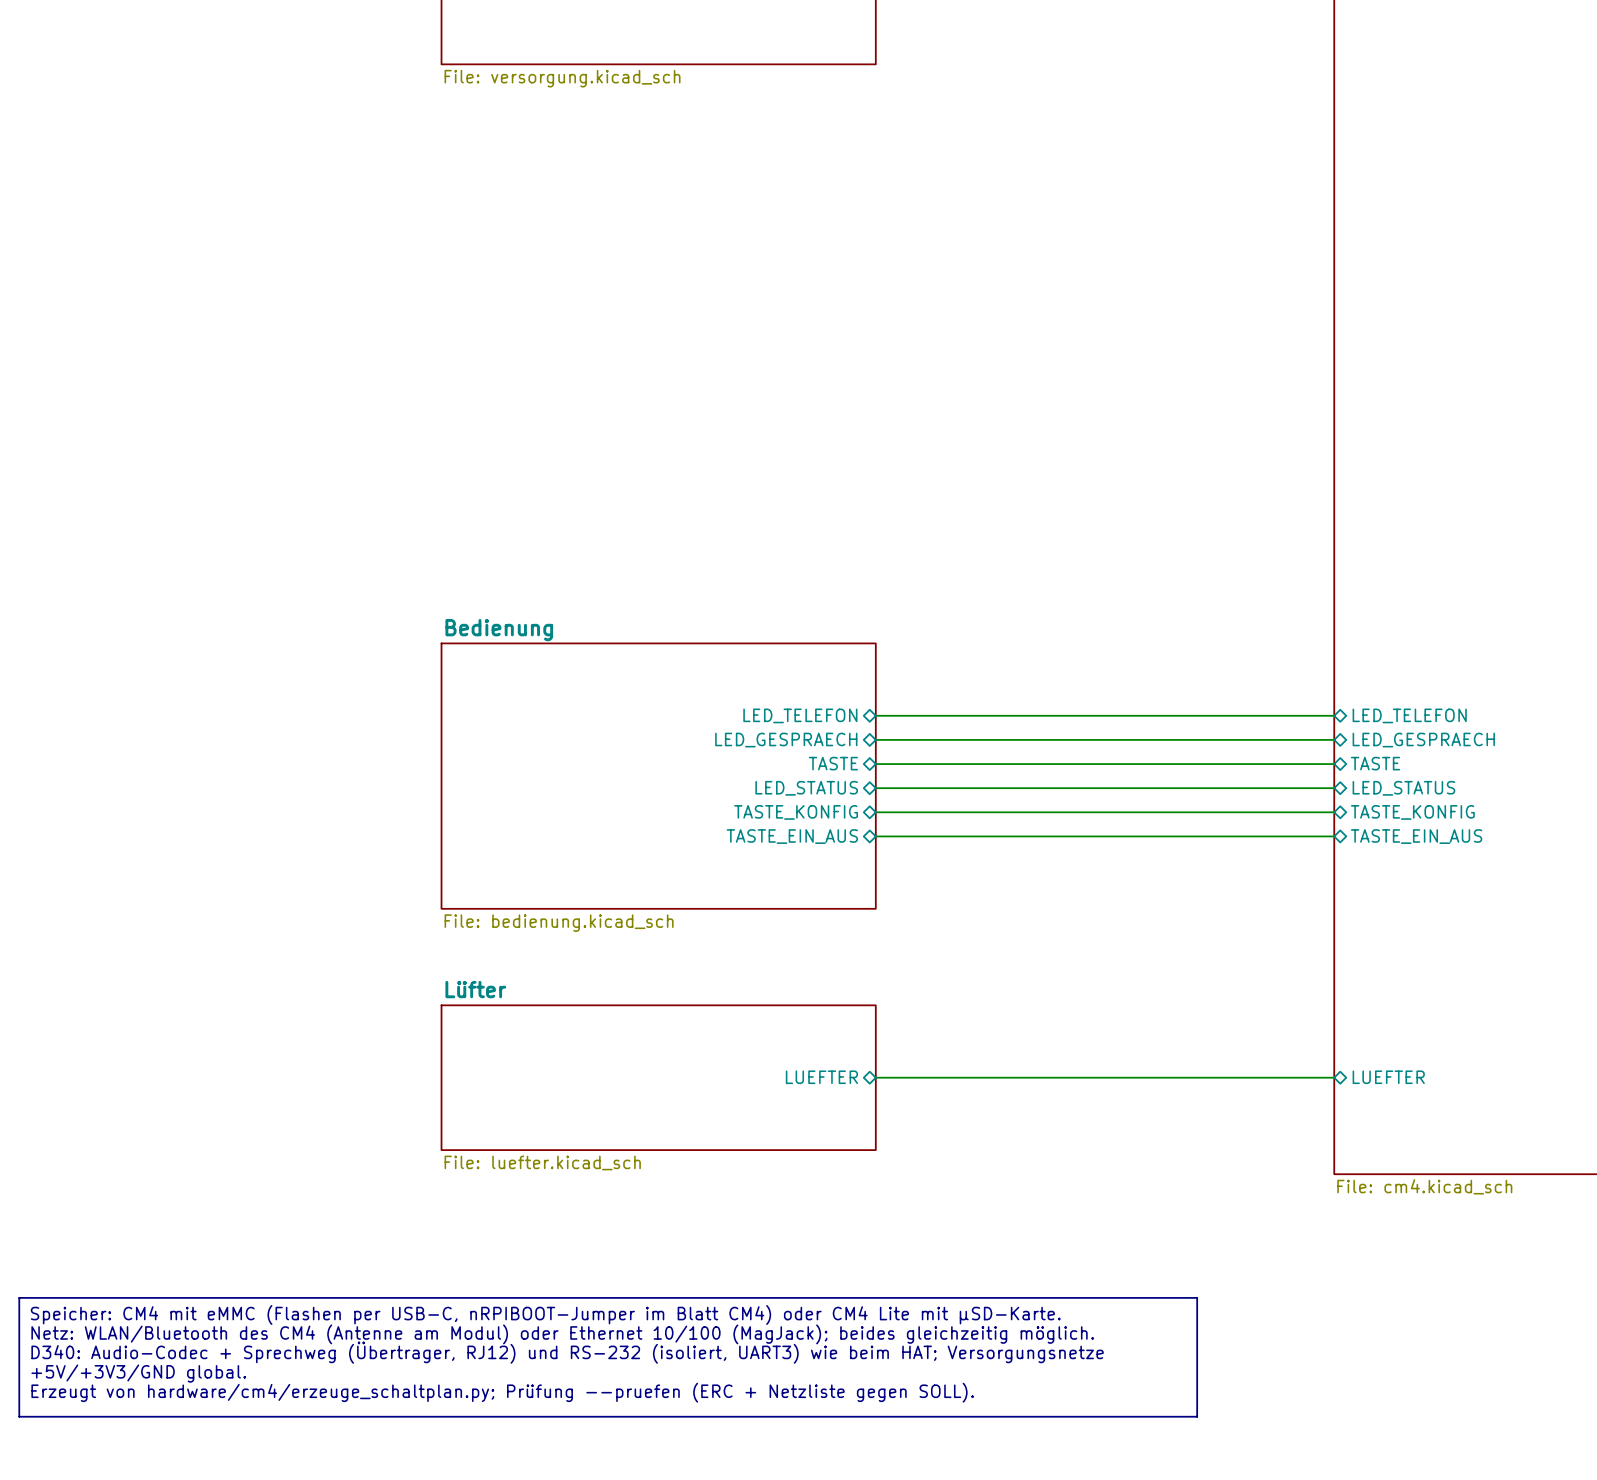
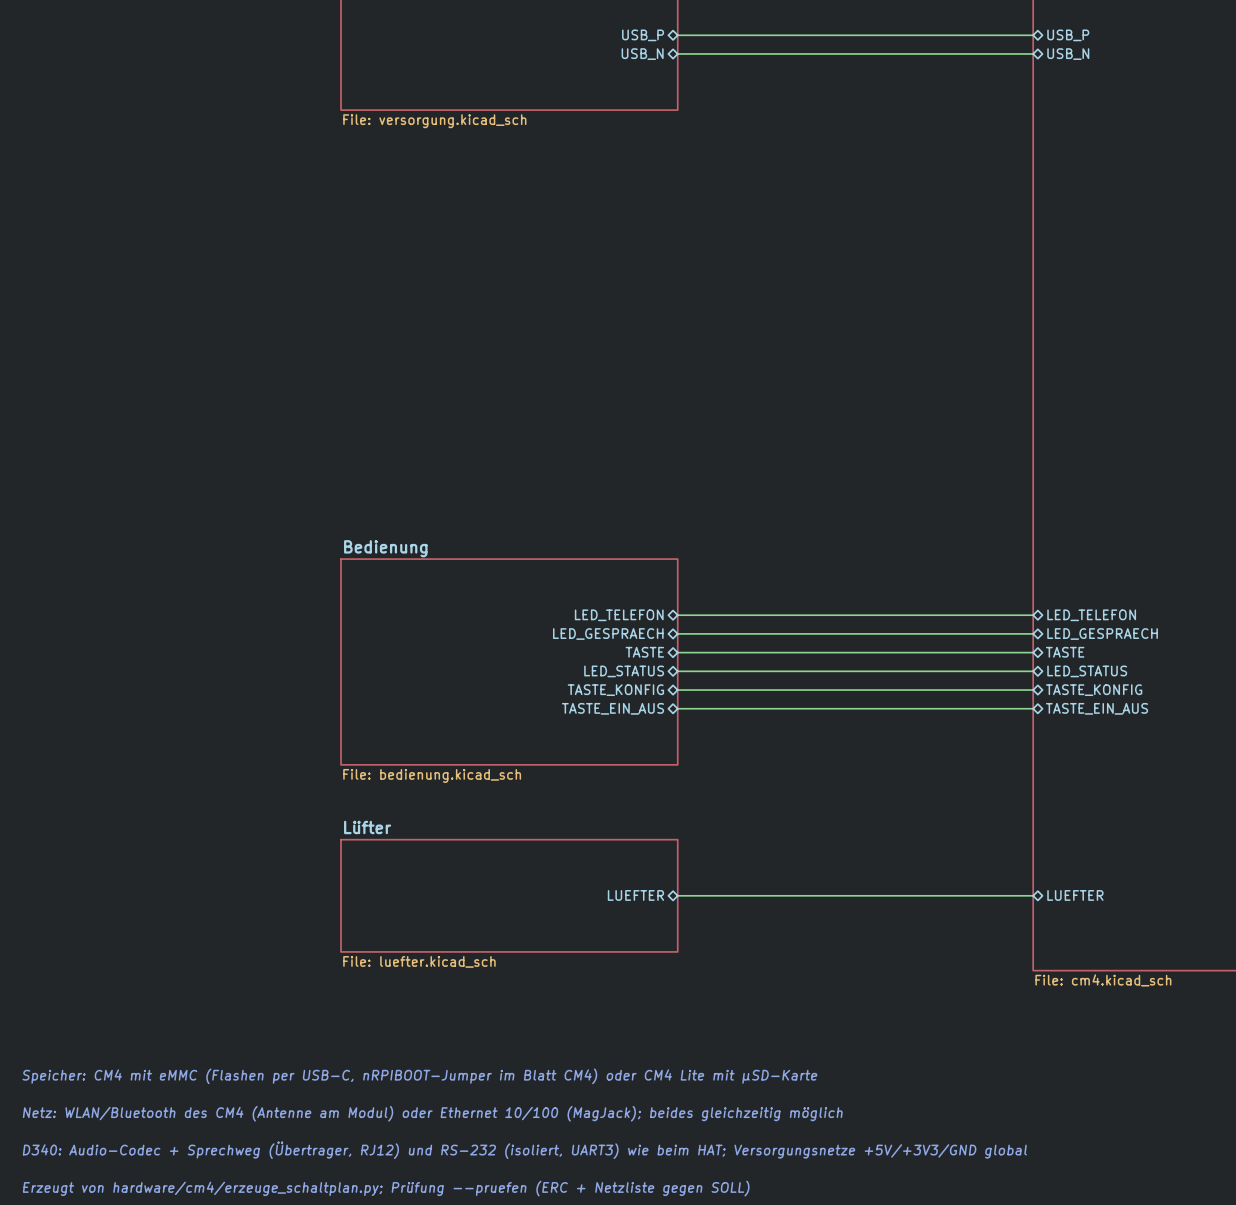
line: (19, 1297) (1197, 1297) (1197, 1416) (19, 1416) (19, 1297) -> none
text: Speicher: CM4 mit eMMC (Flashen per USB-C, nRPIBOOT-Jumper im Blatt CM4) oder CM4 Lite mit µSD-Karte. (545, 1314) -> Speicher: CM4 mit eMMC (Flashen per USB-C, nRPIBOOT-Jumper im Blatt CM4) oder CM4 Lite mit µSD-Karte (419, 1076)
text: Netz: WLAN/Bluetooth des CM4 (Antenne am Modul) oder Ethernet 10/100 (MagJack); beides gleichzeitig möglich. (562, 1334) -> none
text: D340: Audio-Codec + Sprechweg (Übertrager, RJ12) und RS-232 (isoliert, UART3) wie beim HAT; Versorgungsnetze (567, 1352) -> none
text: +5V/+3V3/GND global. (138, 1373) -> Netz: WLAN/Bluetooth des CM4 (Antenne am Modul) oder Ethernet 10/100 (MagJack); beides gleichzeitig möglich (432, 1113)
text: Erzeugt von hardware/cm4/erzeuge_schaltplan.py; Prüfung --pruefen (ERC + Netzliste gegen SOLL). (502, 1392) -> none
text: none -> D340: Audio-Codec + Sprechweg (Übertrager, RJ12) und RS-232 (isoliert, UART3) wie beim HAT; Versorgungsnetze +5V/+3V3/GND global (524, 1150)
text: none -> Erzeugt von hardware/cm4/erzeuge_schaltplan.py; Prüfung --pruefen (ERC + Netzliste gegen SOLL) (386, 1188)

